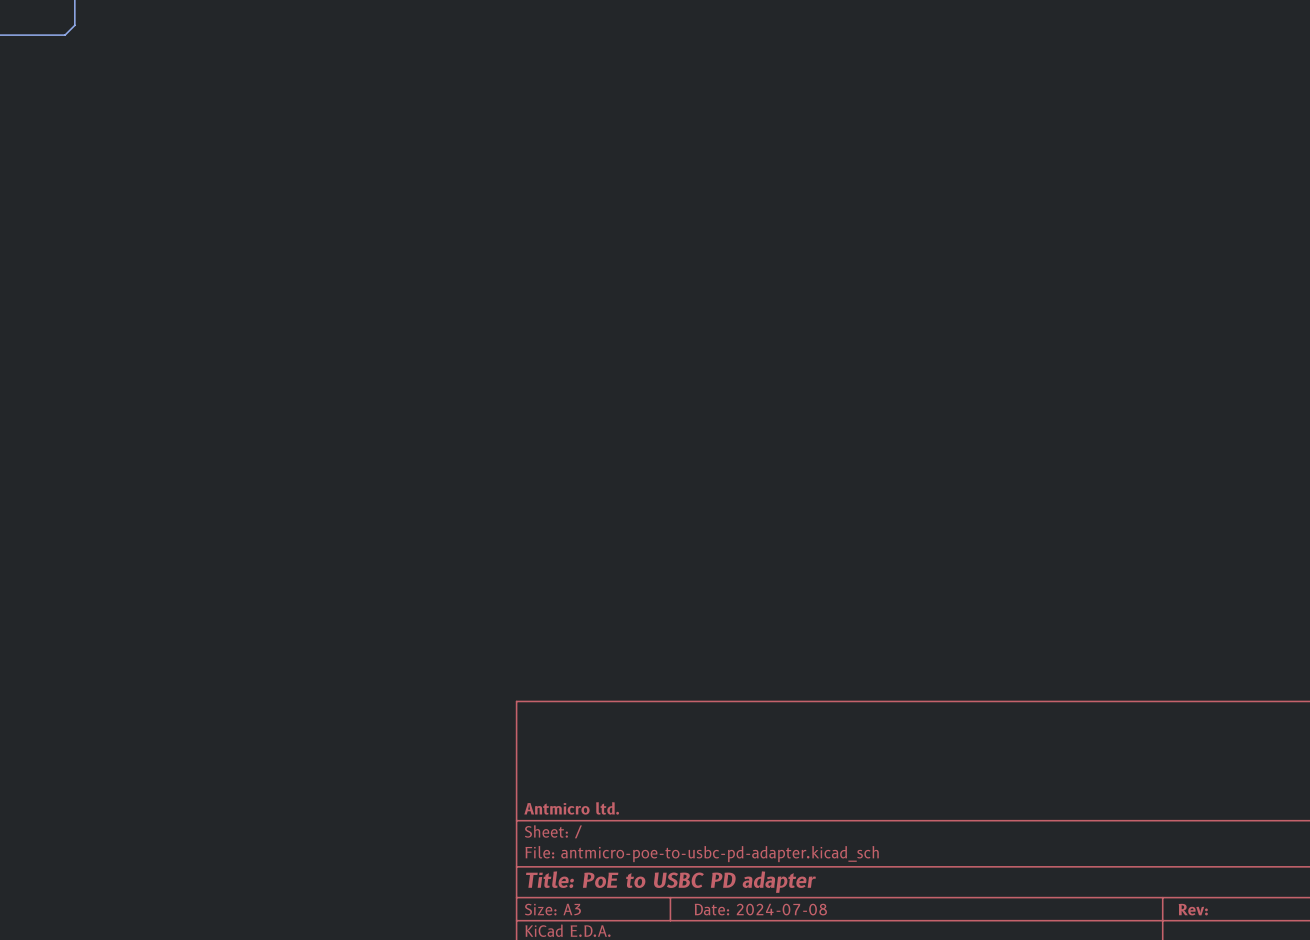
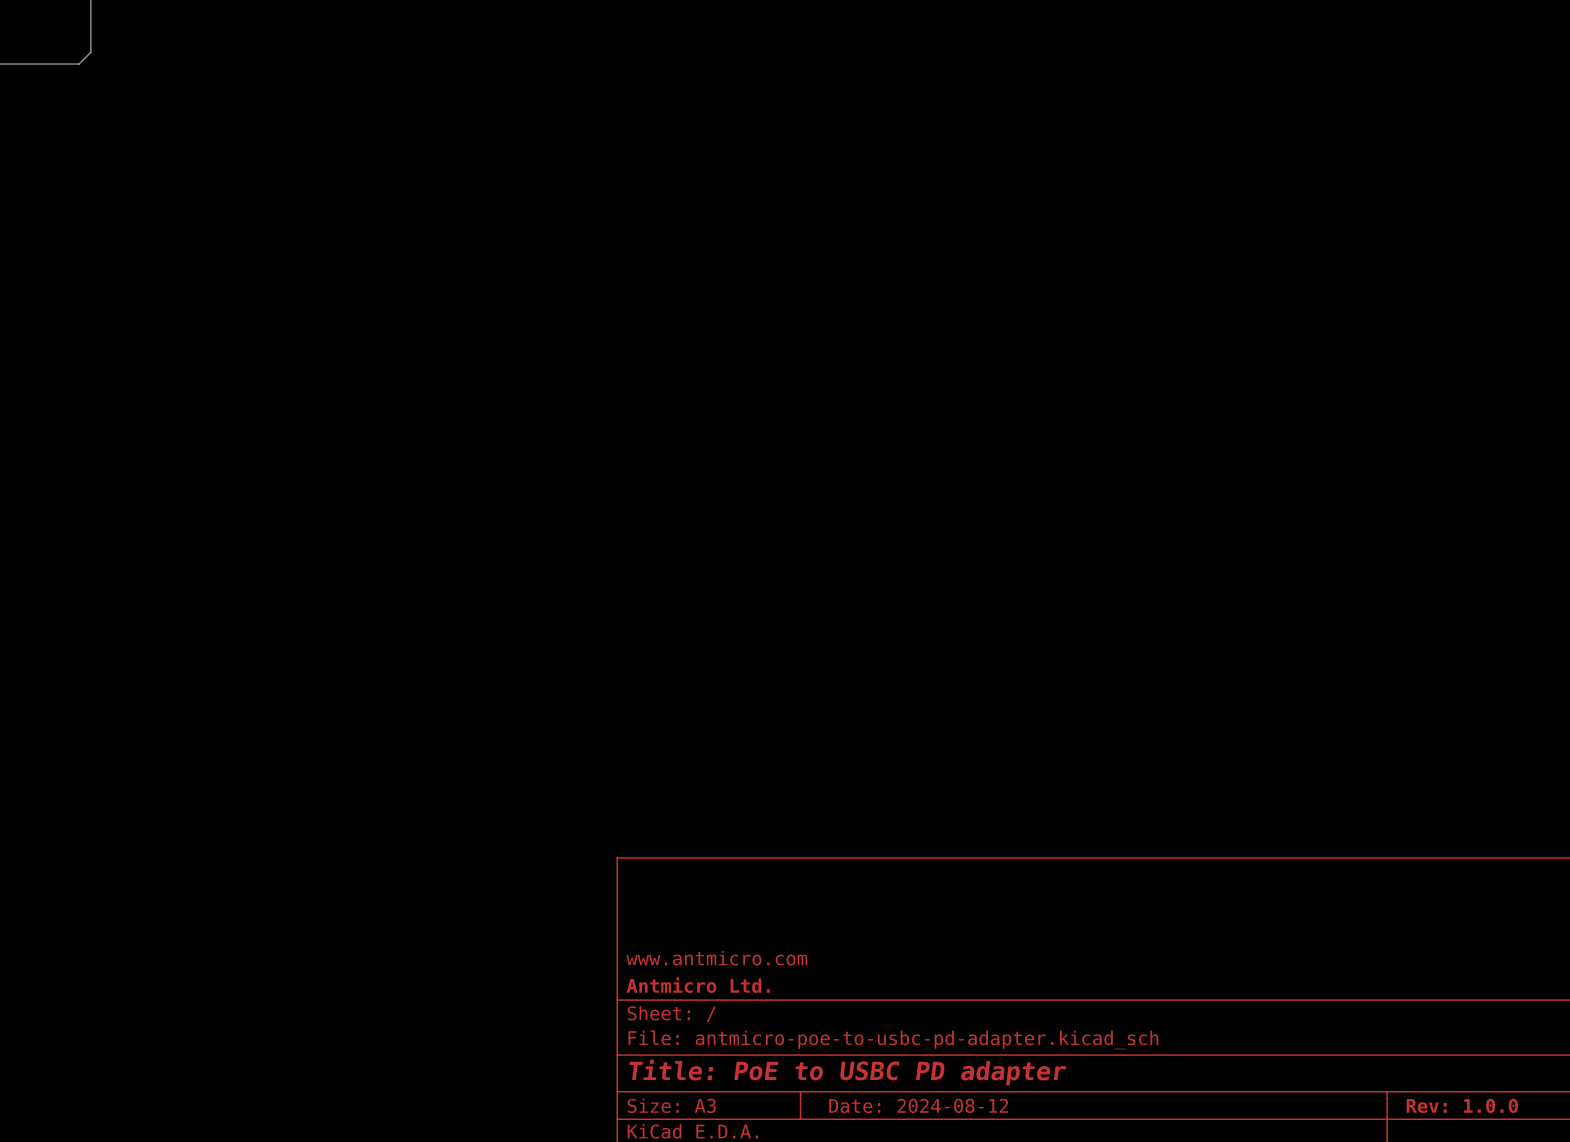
title block: none -> www.antmicro.com (716, 958)
title block: Antmicro ltd. (571, 808) -> Antmicro Ltd. (698, 985)
title block: Date: 2024-07-08 (760, 909) -> Date: 2024-08-12 (918, 1105)
title block: Rev: (1193, 909) -> Rev: 1.0.0 (1462, 1105)

